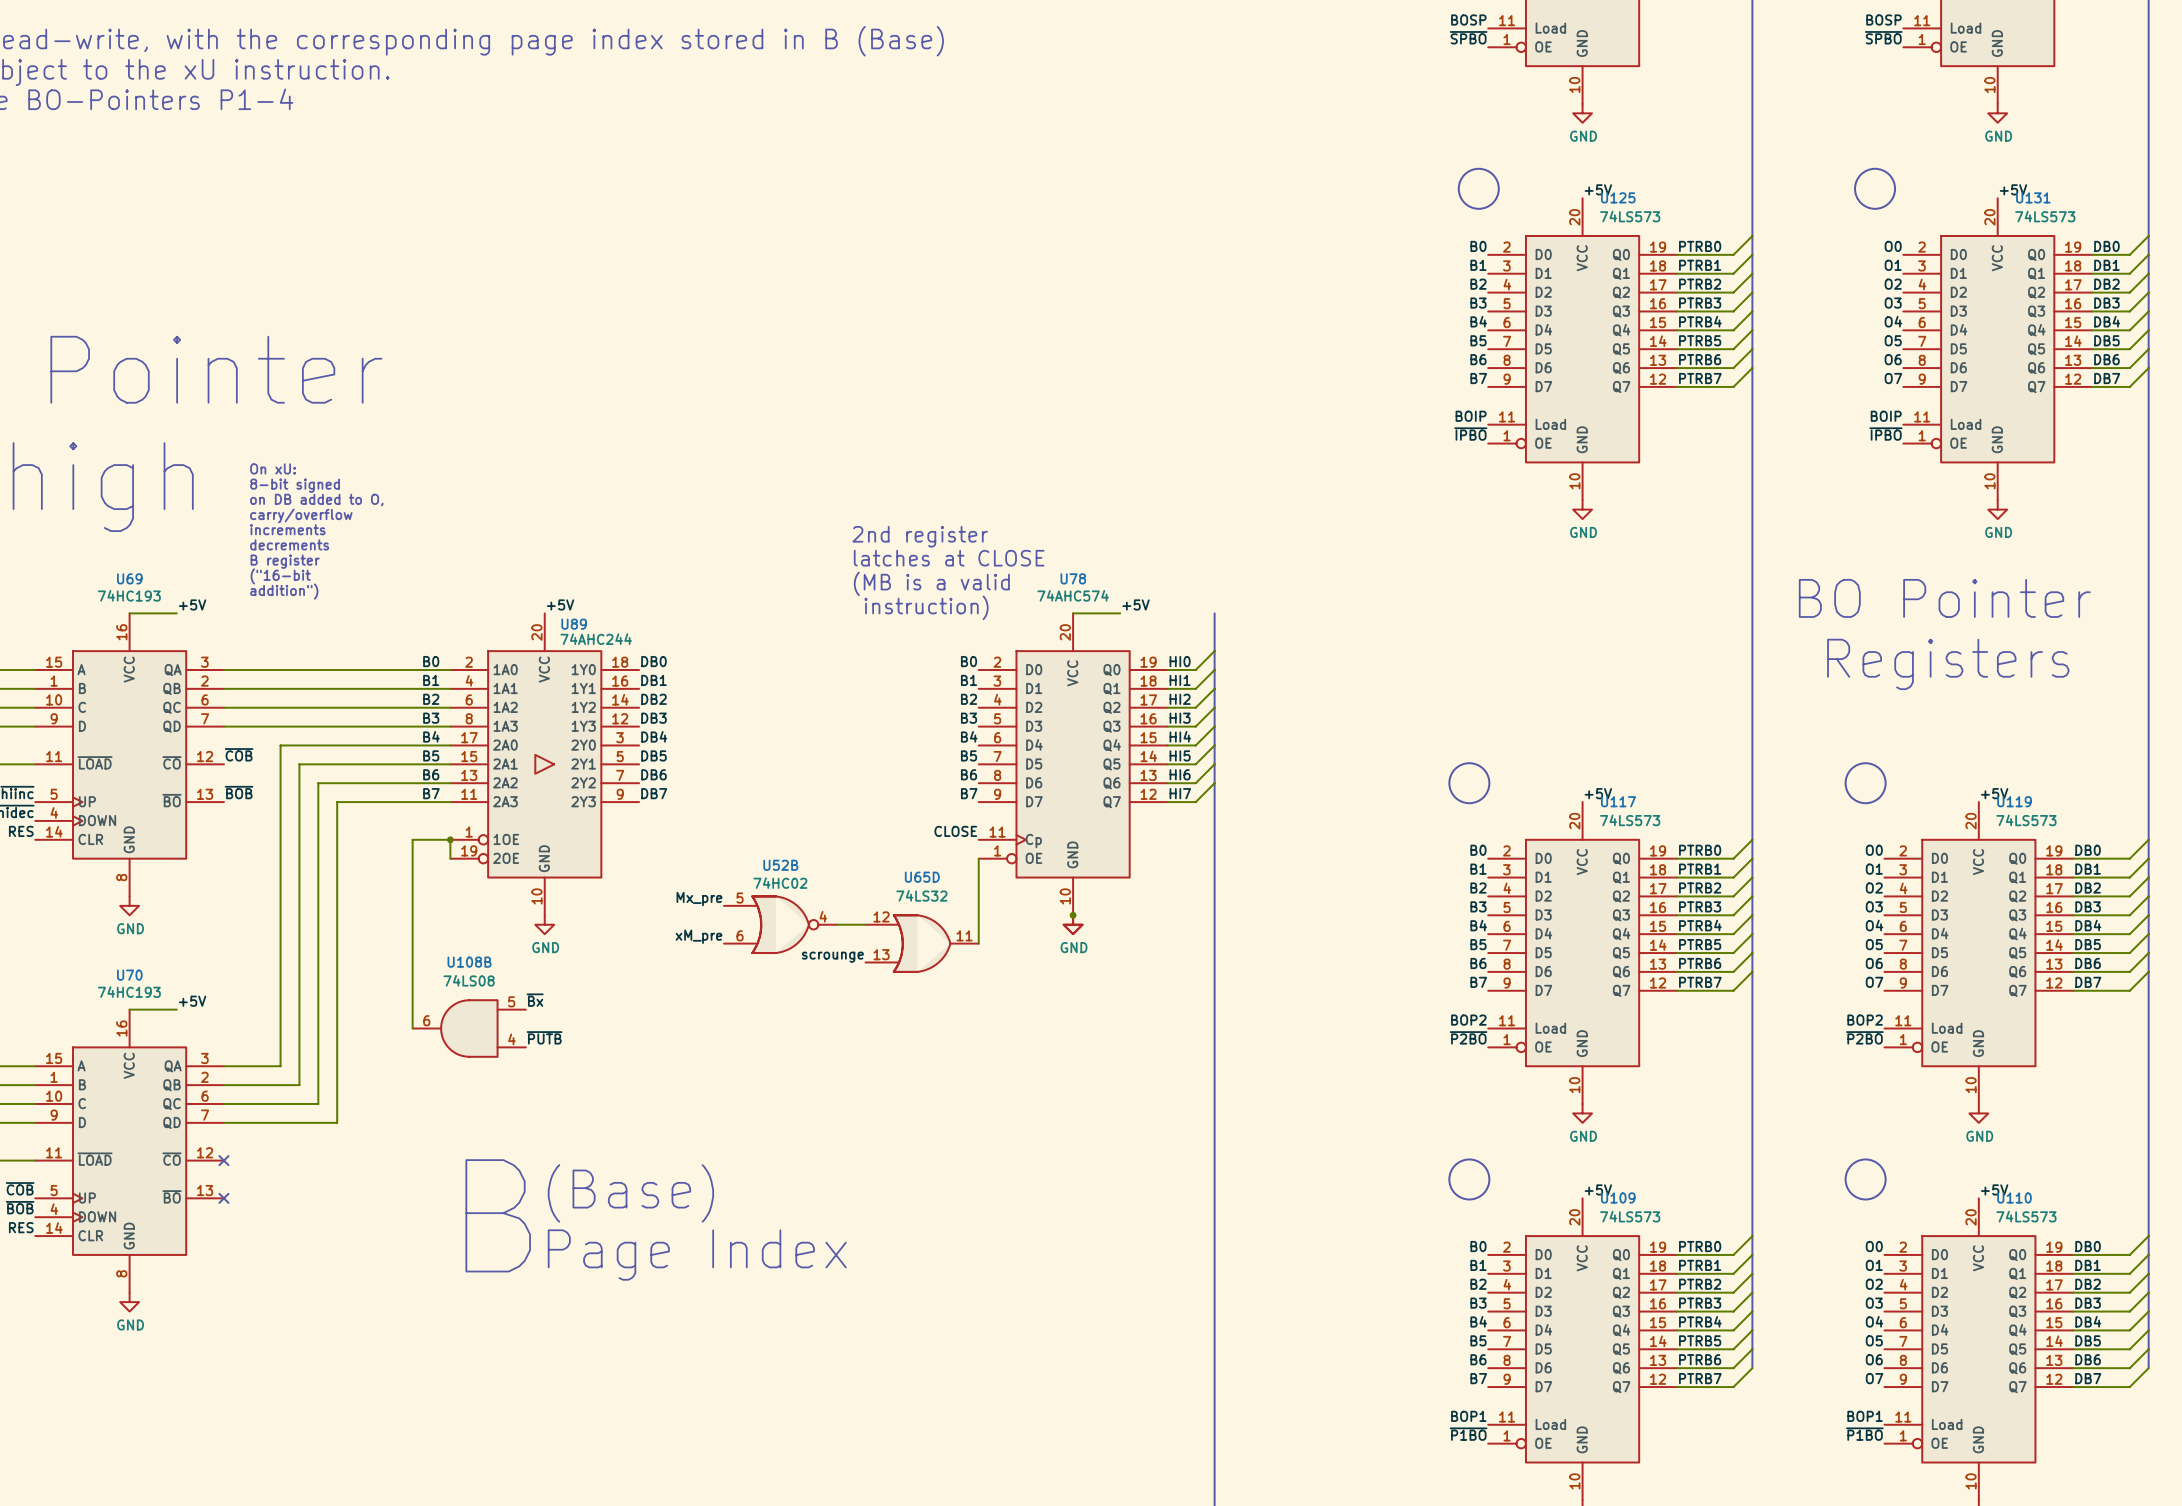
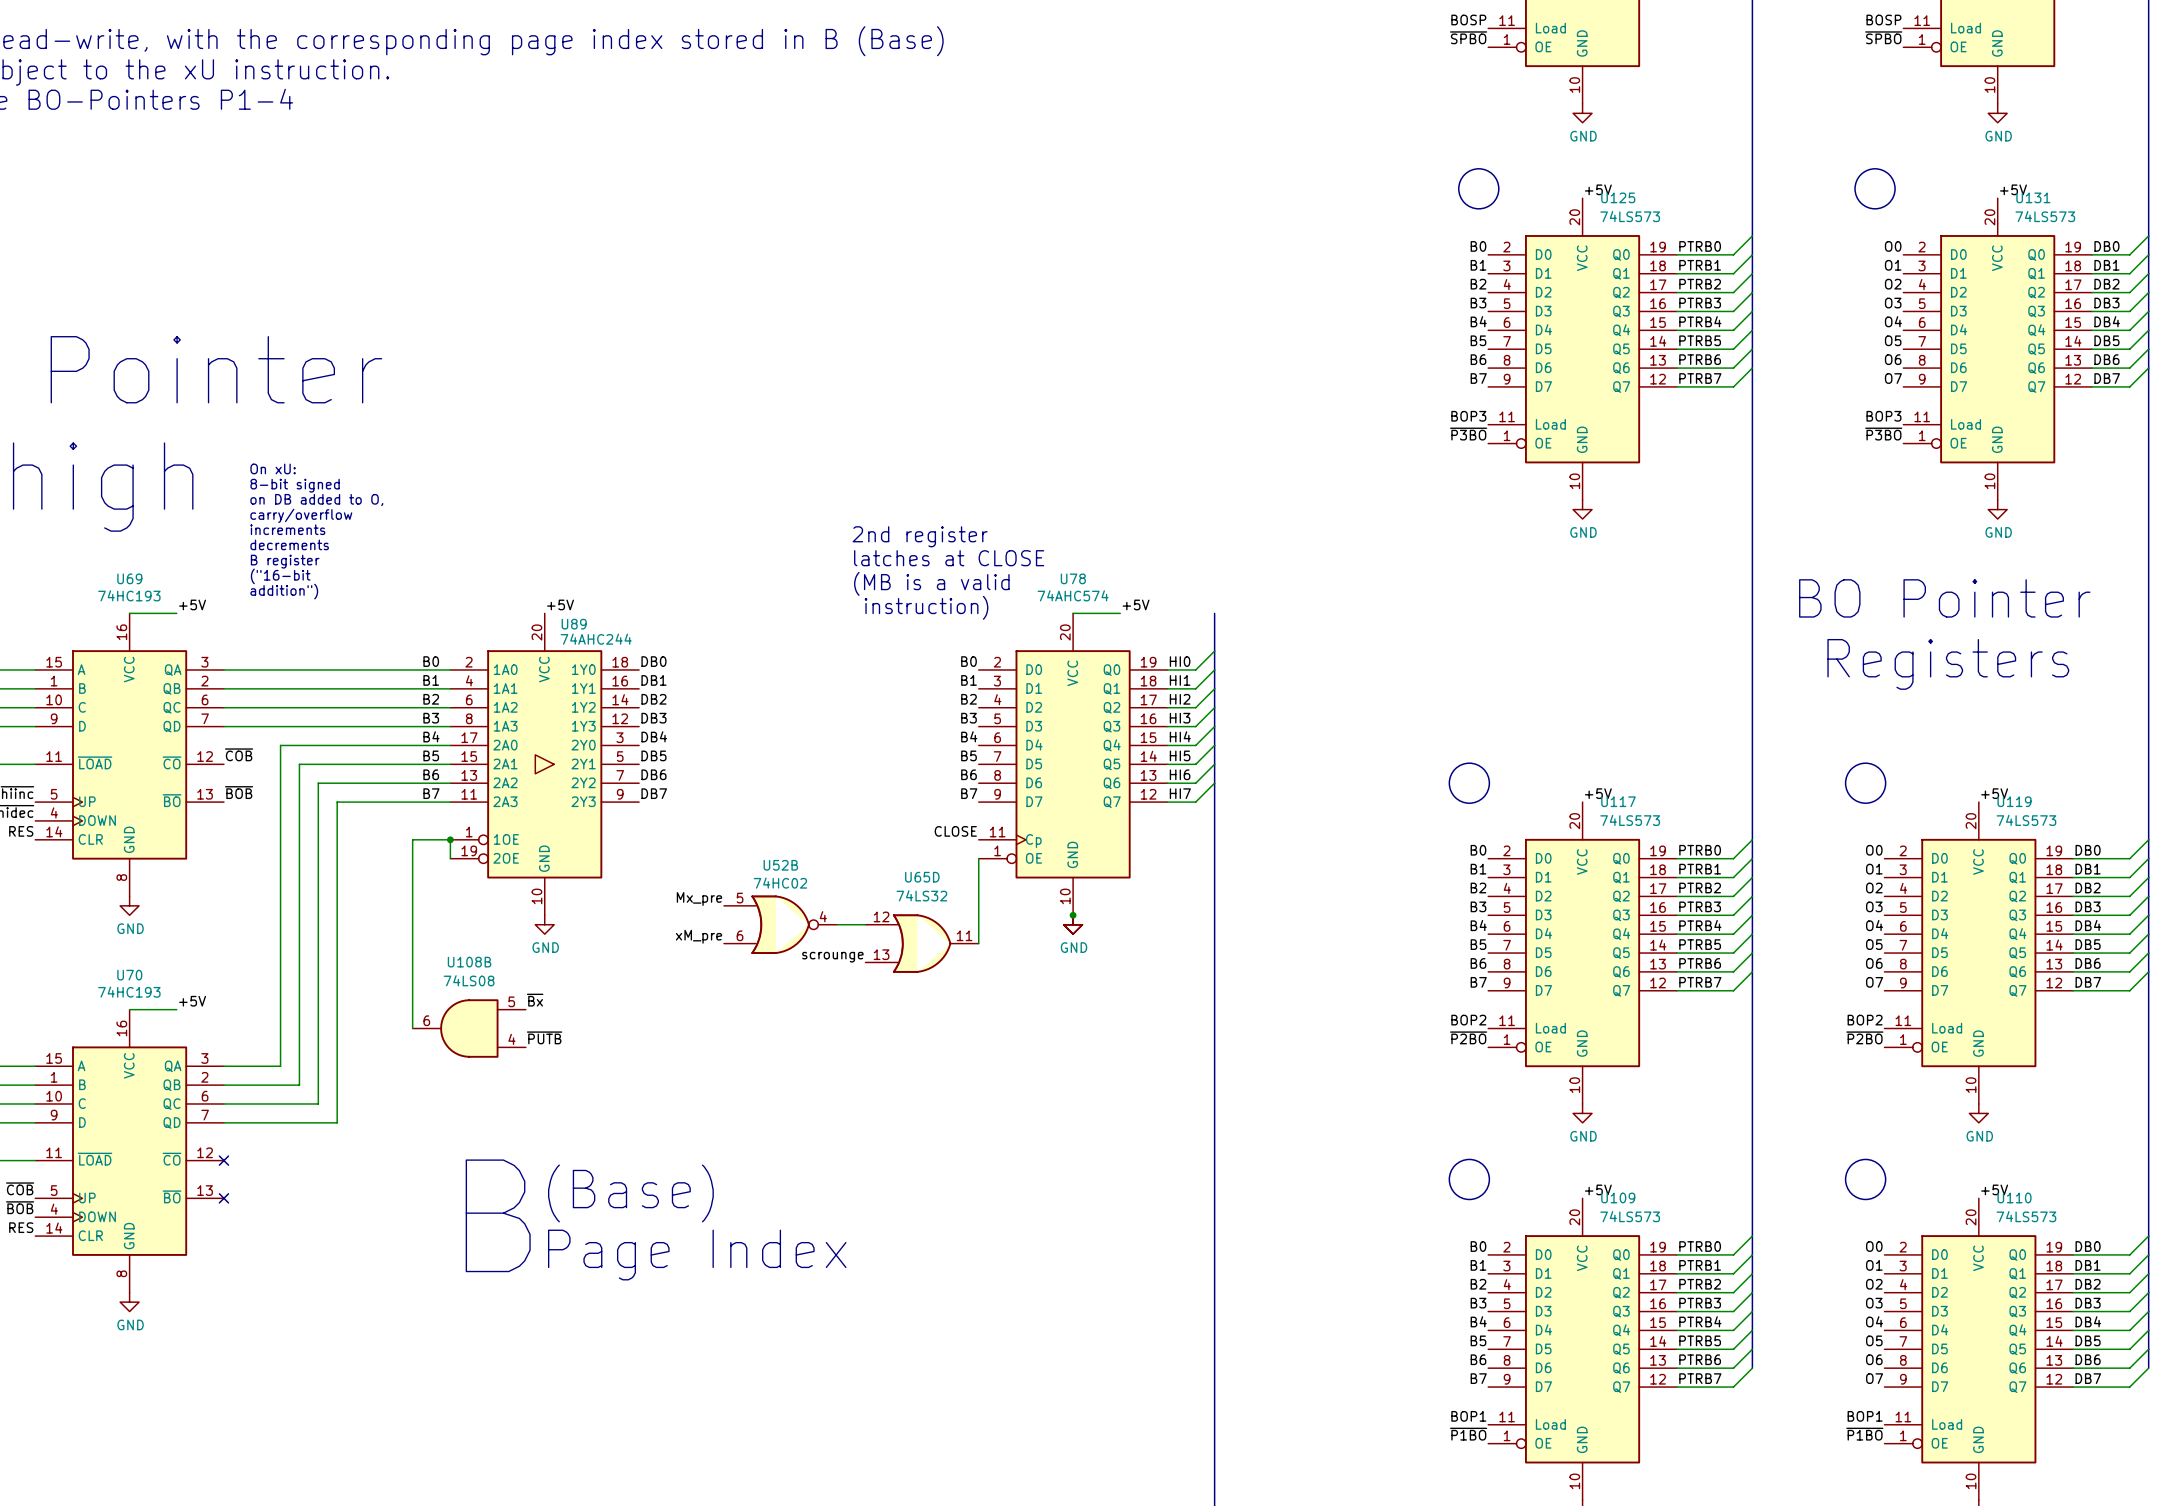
label: BOIP (1471, 416) -> BOP3 (1468, 416)
label: BOIP (1886, 416) -> BOP3 (1883, 416)
label: ~{IPBO} (1470, 434) -> ~{P3BO} (1468, 434)
label: ~{IPBO} (1885, 434) -> ~{P3BO} (1883, 434)

